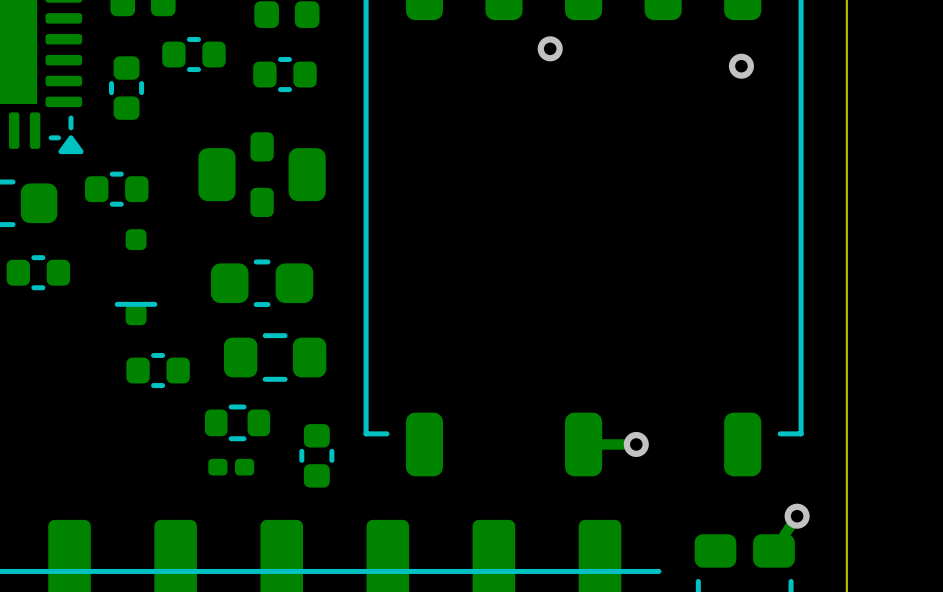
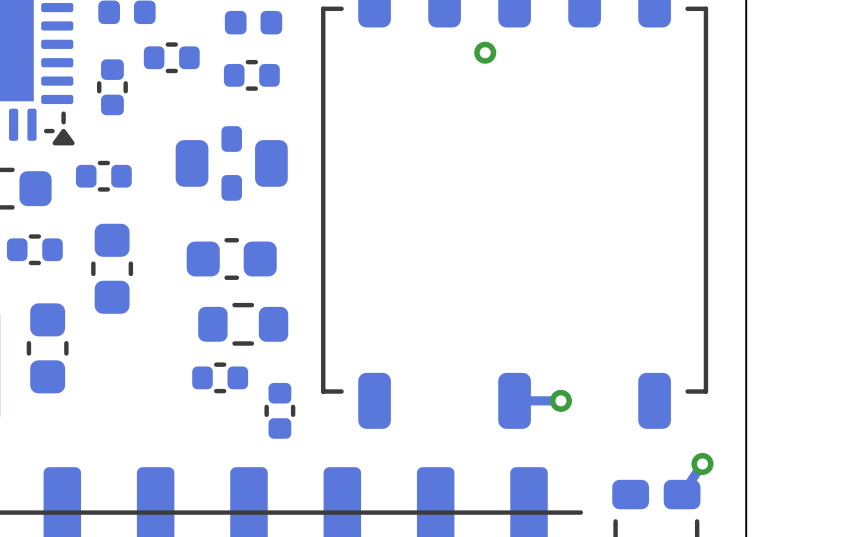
via: (741, 66) -> none
part footprint: [114, 229, 158, 326] -> [91, 223, 134, 314]
part: (158, 370) -> none
part: none -> (47, 348)
part footprint: [204, 404, 271, 442] -> [192, 362, 249, 394]
part: (231, 467) -> none

